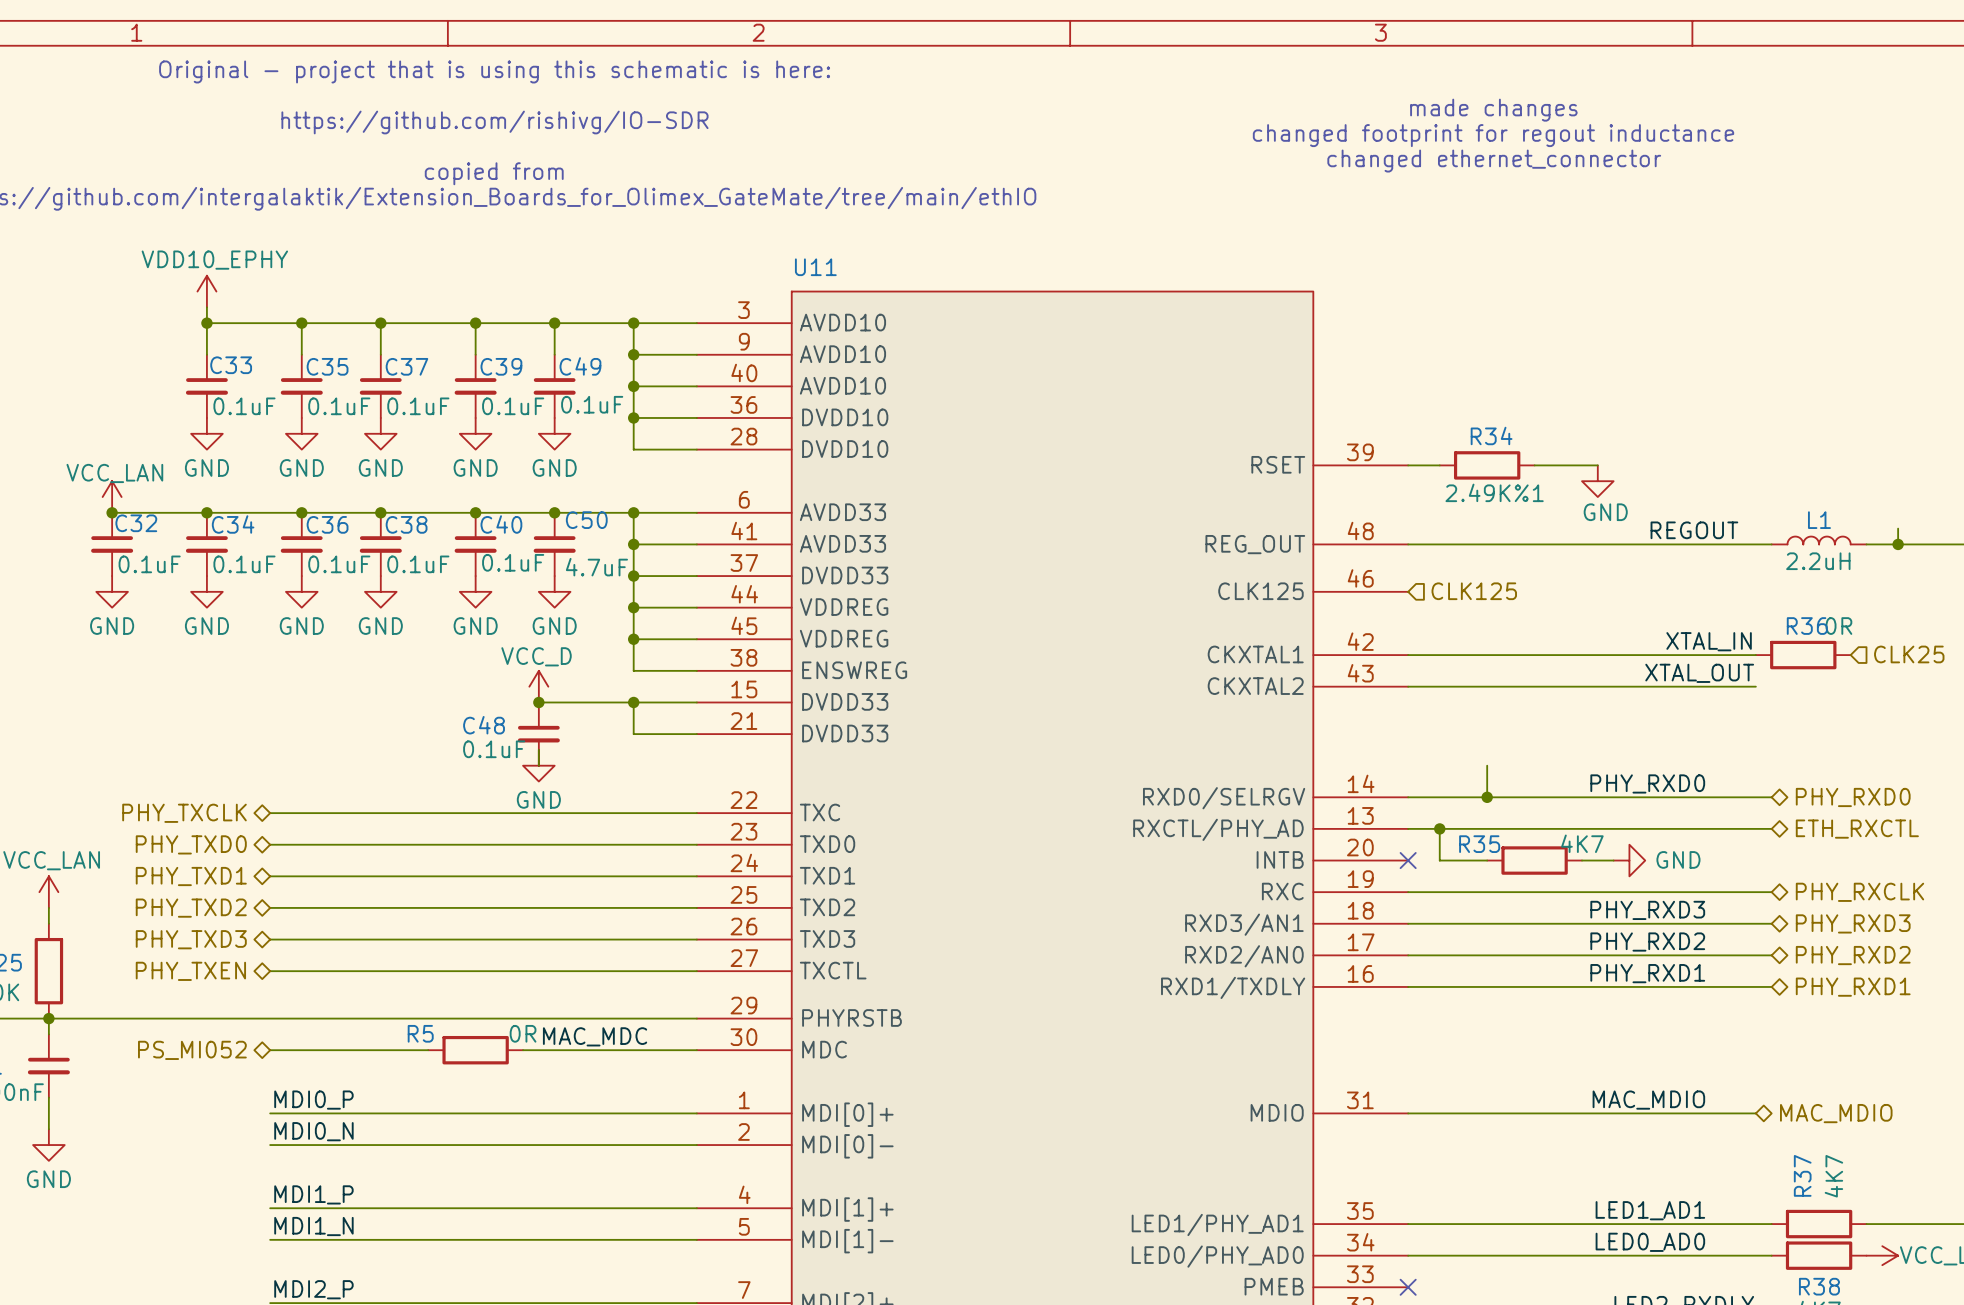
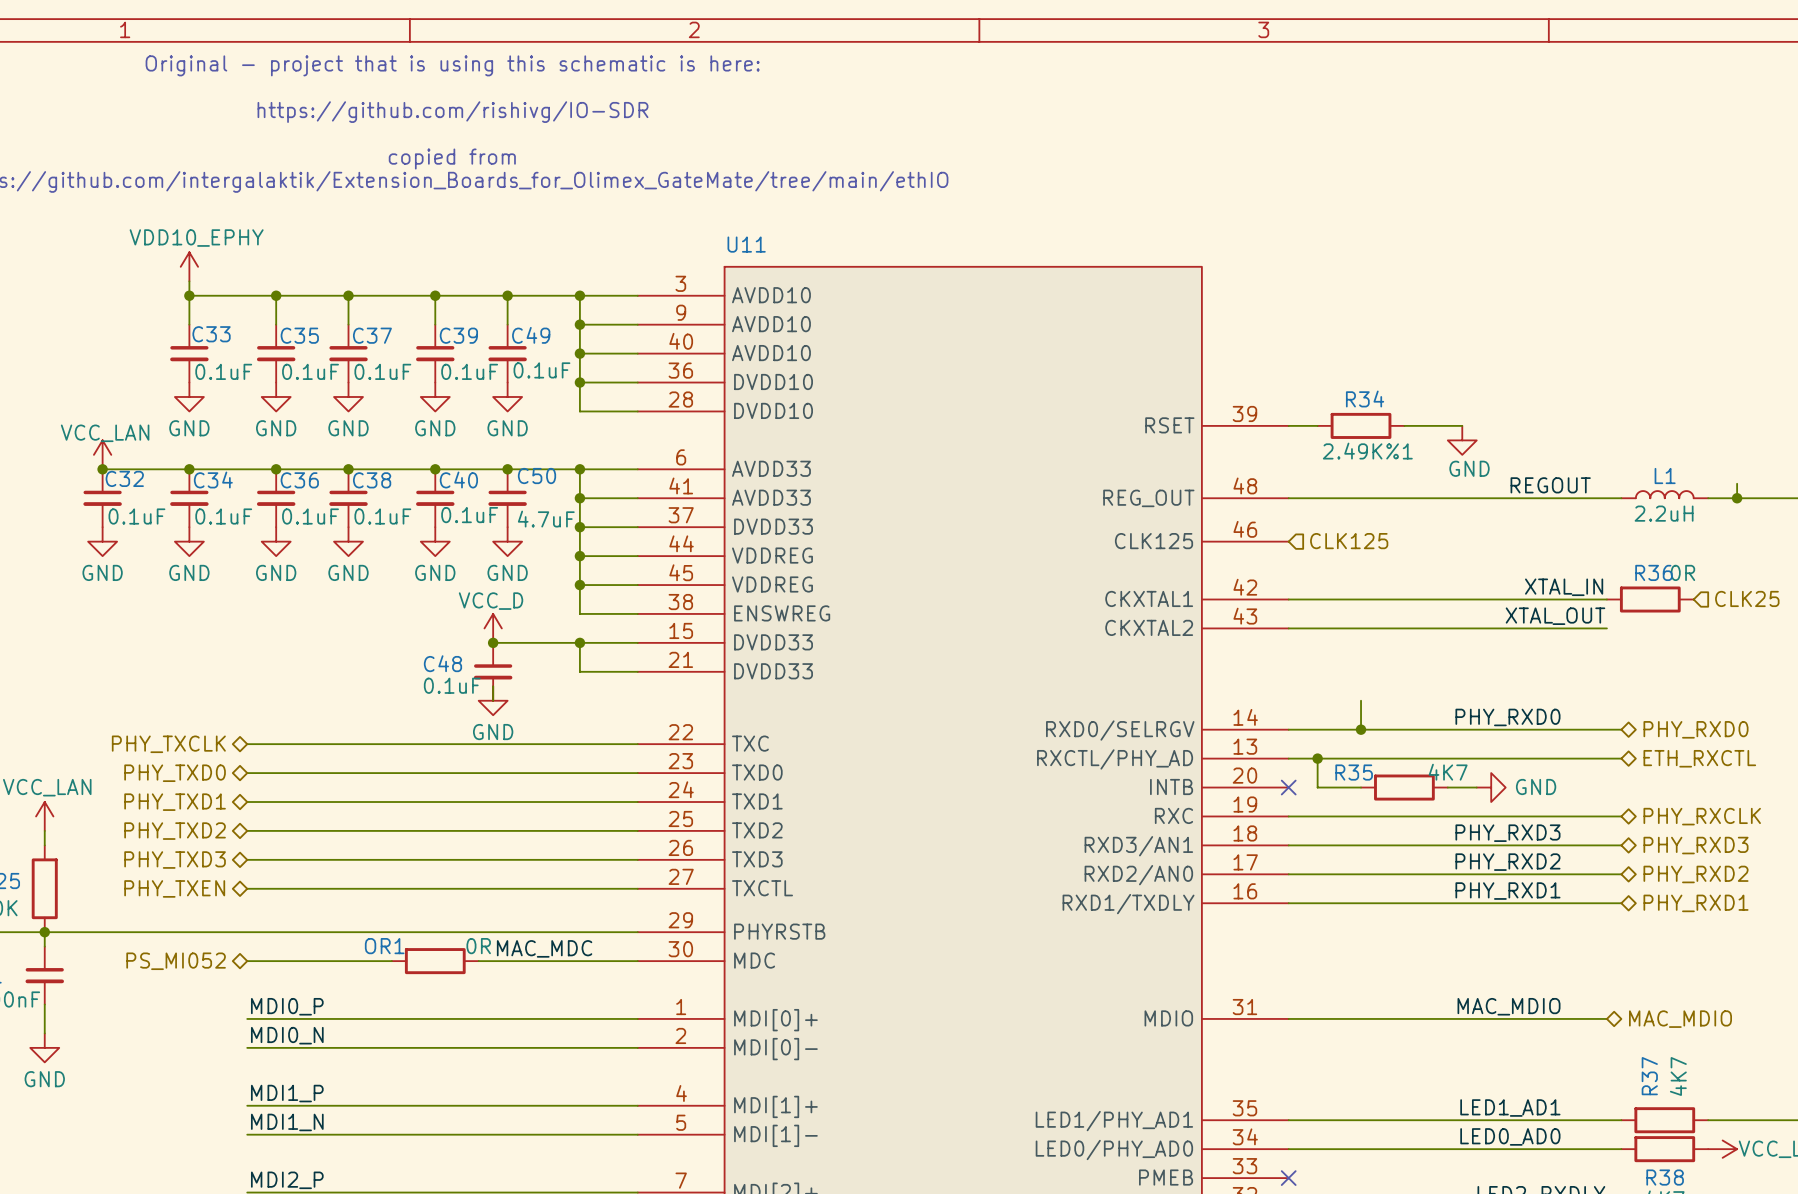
text: made changes (1493, 110) -> none
text: changed footprint for regout inductance (1493, 135) -> none
text: changed ethernet_connector (1494, 161) -> none
R5 name: R5 (420, 1033) -> OR1 (384, 946)

